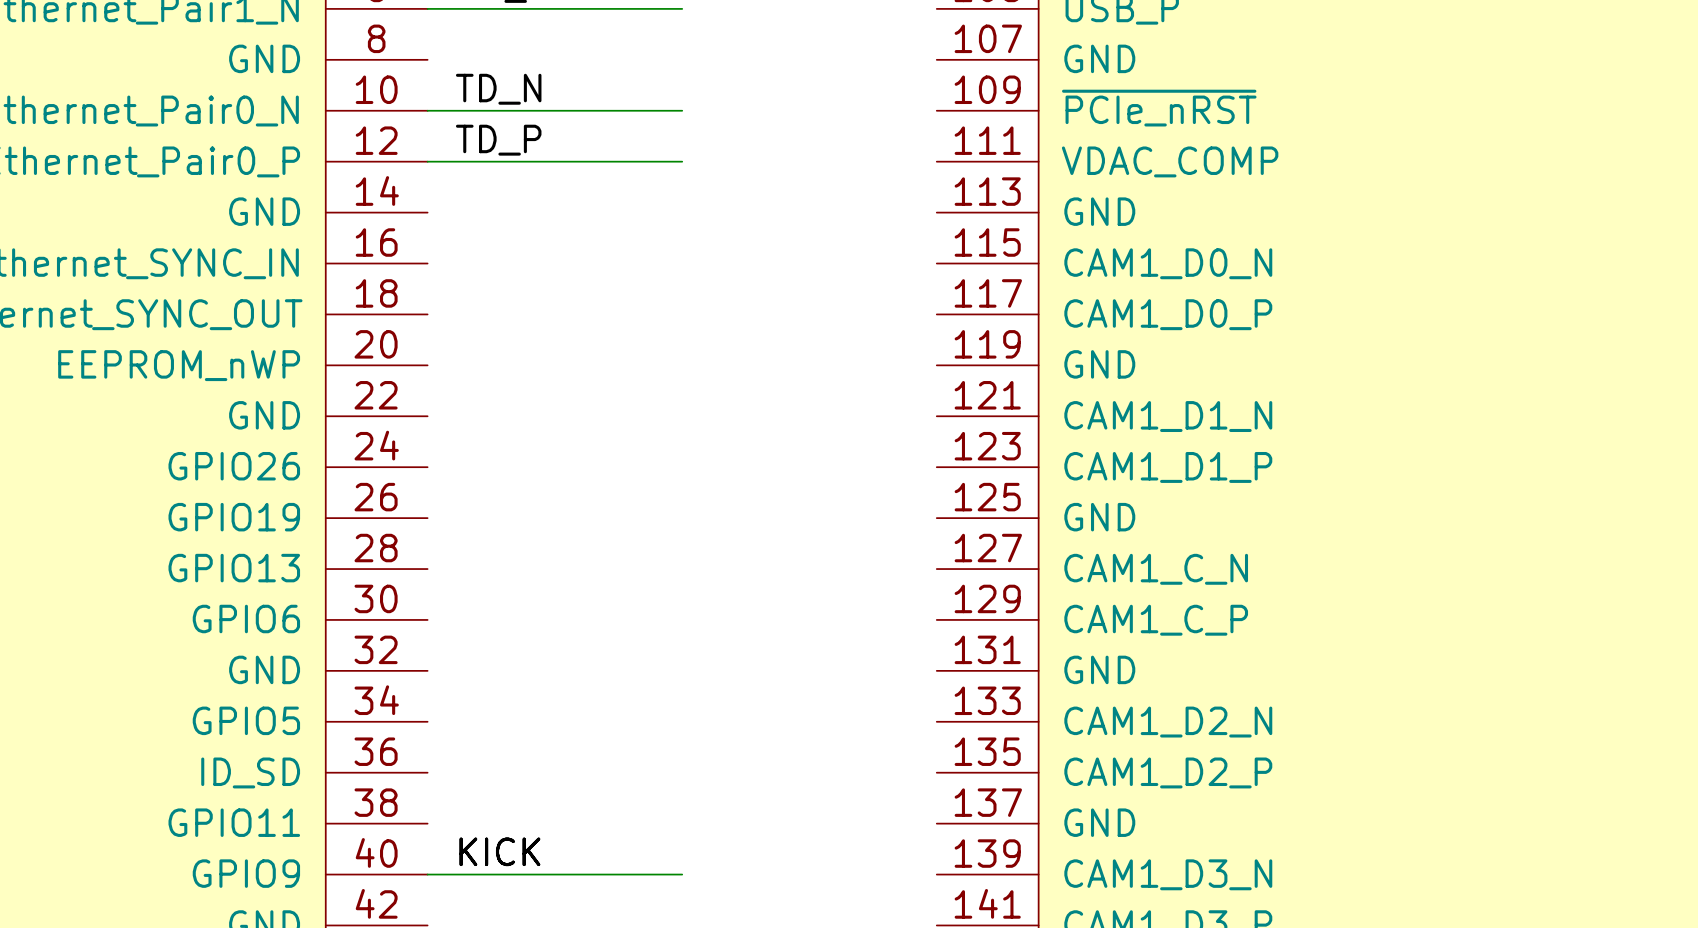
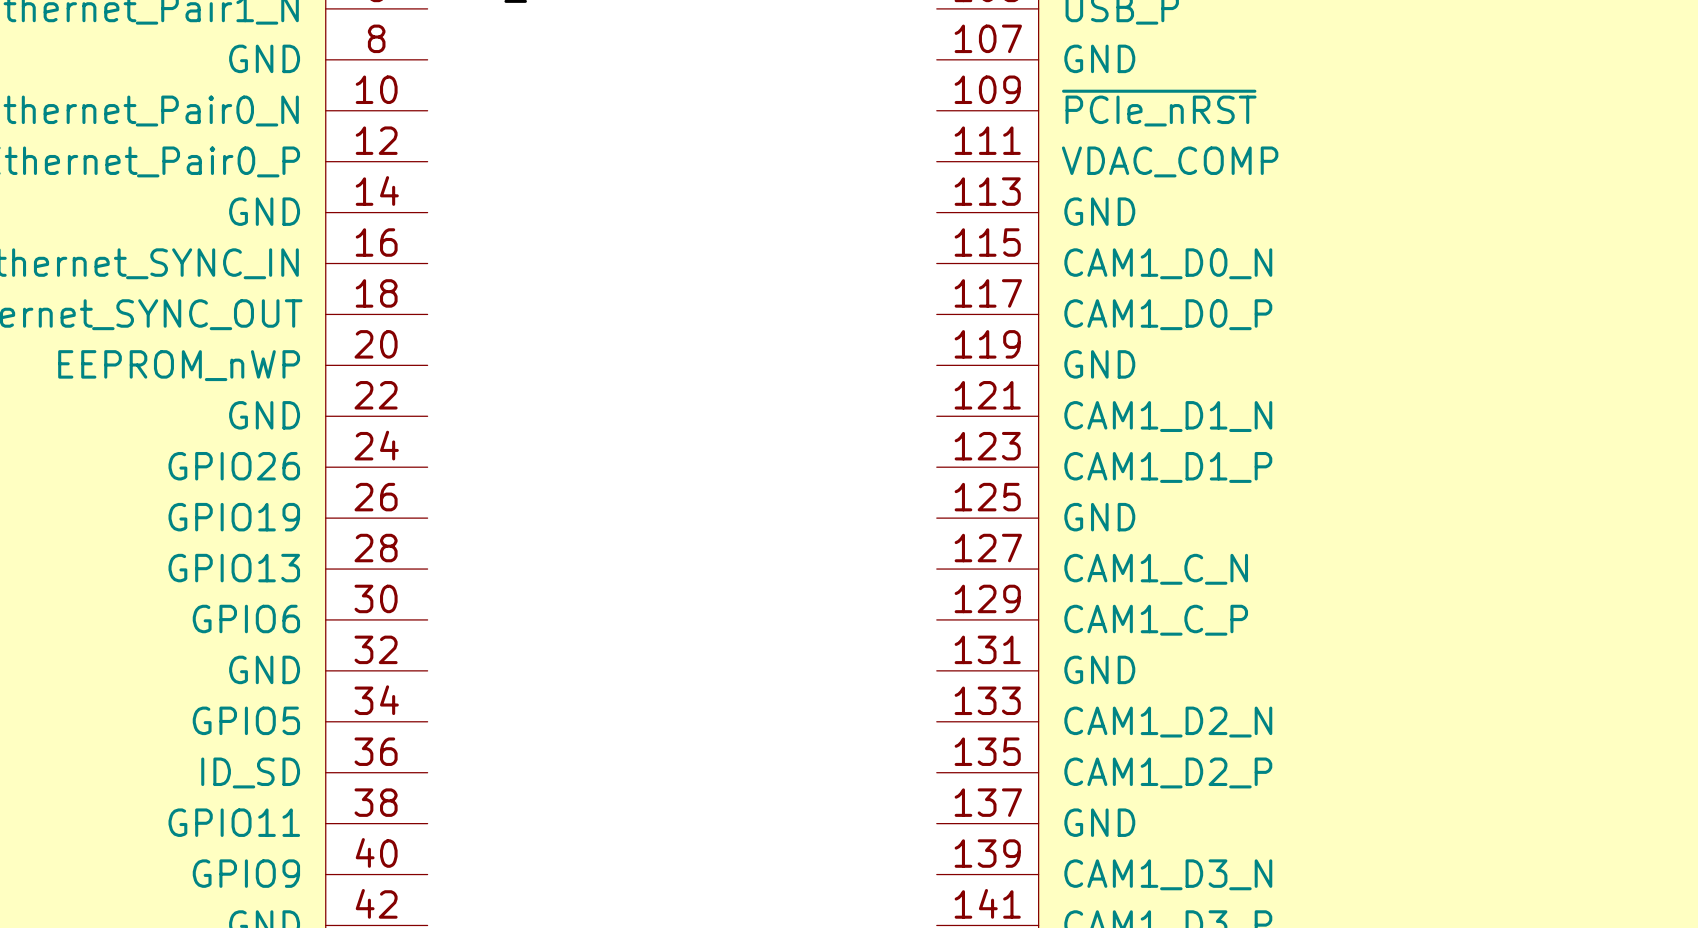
wire: (427, 8) (682, 8) -> none
label: TD_N (498, 89) -> none
wire: (427, 110) (682, 110) -> none
label: TD_P (498, 140) -> none
wire: (427, 161) (682, 161) -> none
label: KICK (499, 851) -> none
wire: (427, 874) (682, 874) -> none

